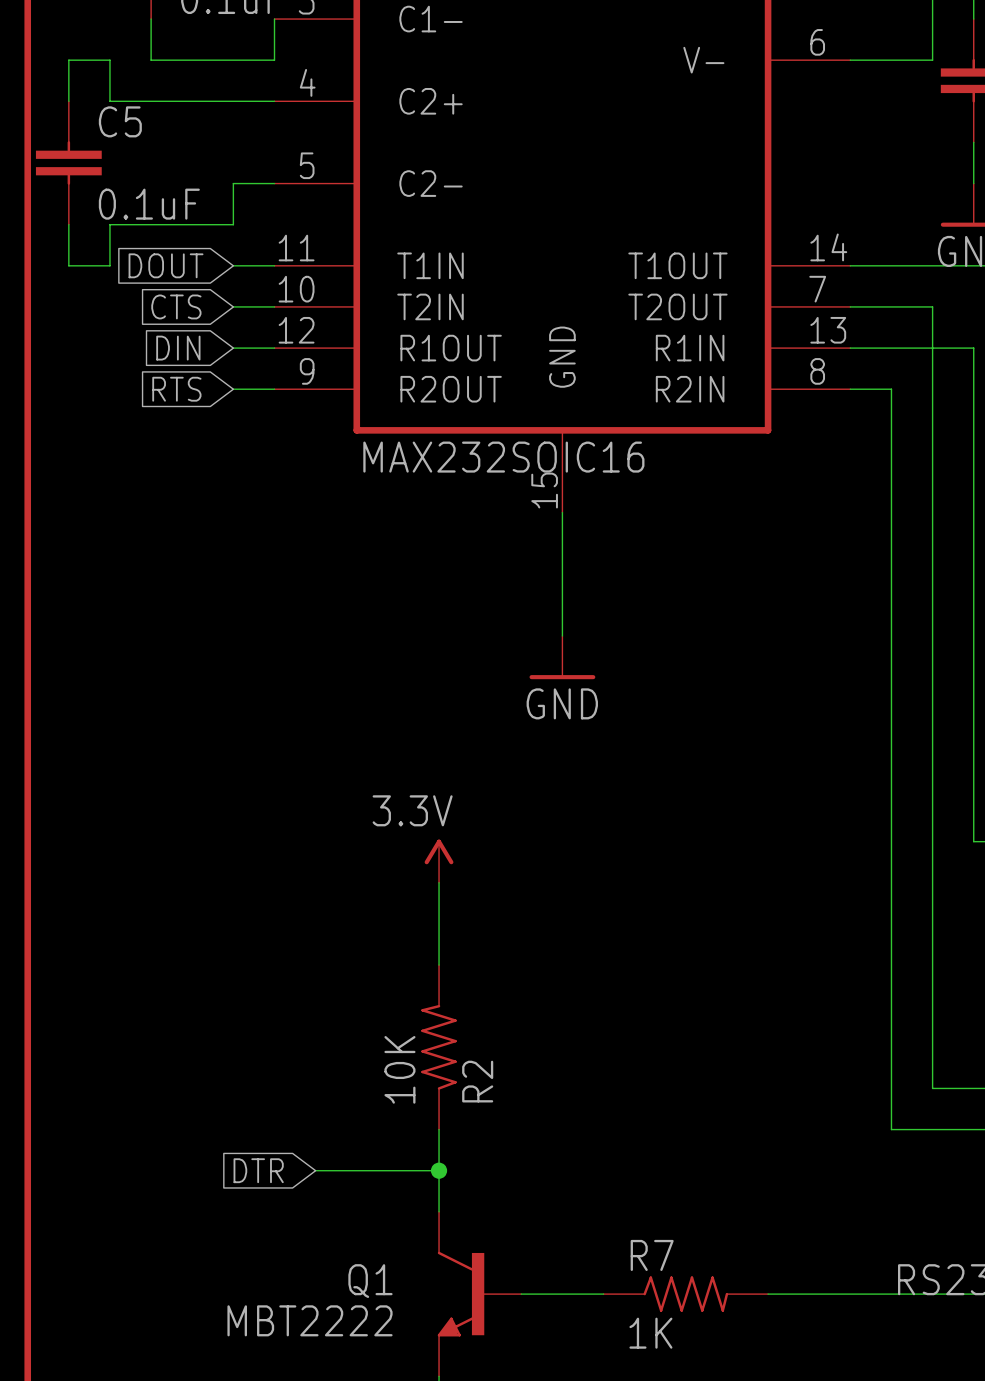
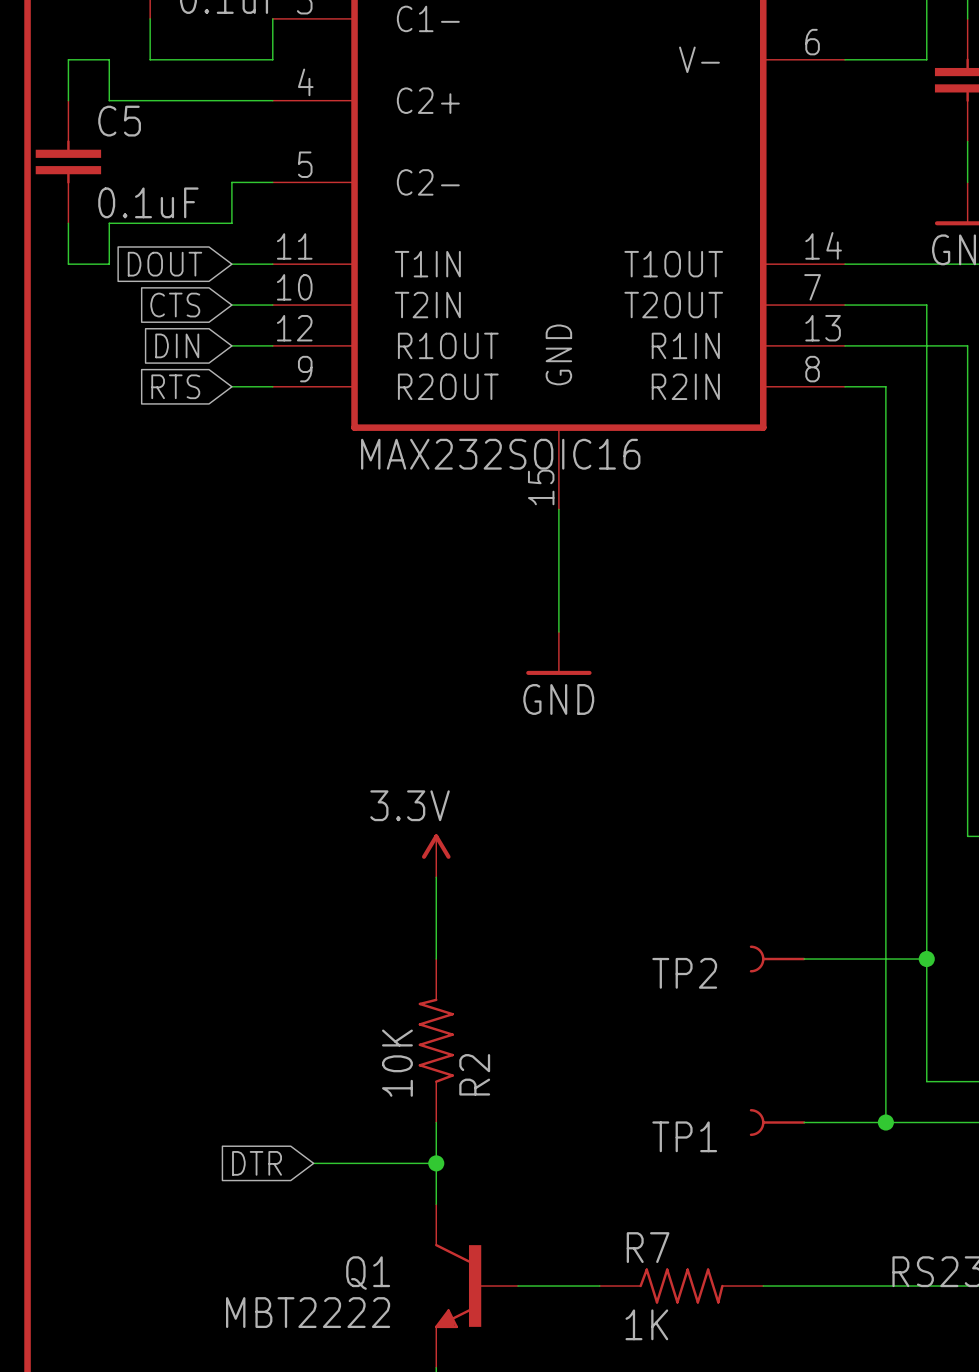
TP2: none -> (777, 959)
wire: none -> (804, 959) (926, 959)
junction: none -> (926, 959)
TP1: none -> (777, 1122)
wire: none -> (804, 1122) (885, 1122)
junction: none -> (885, 1122)

